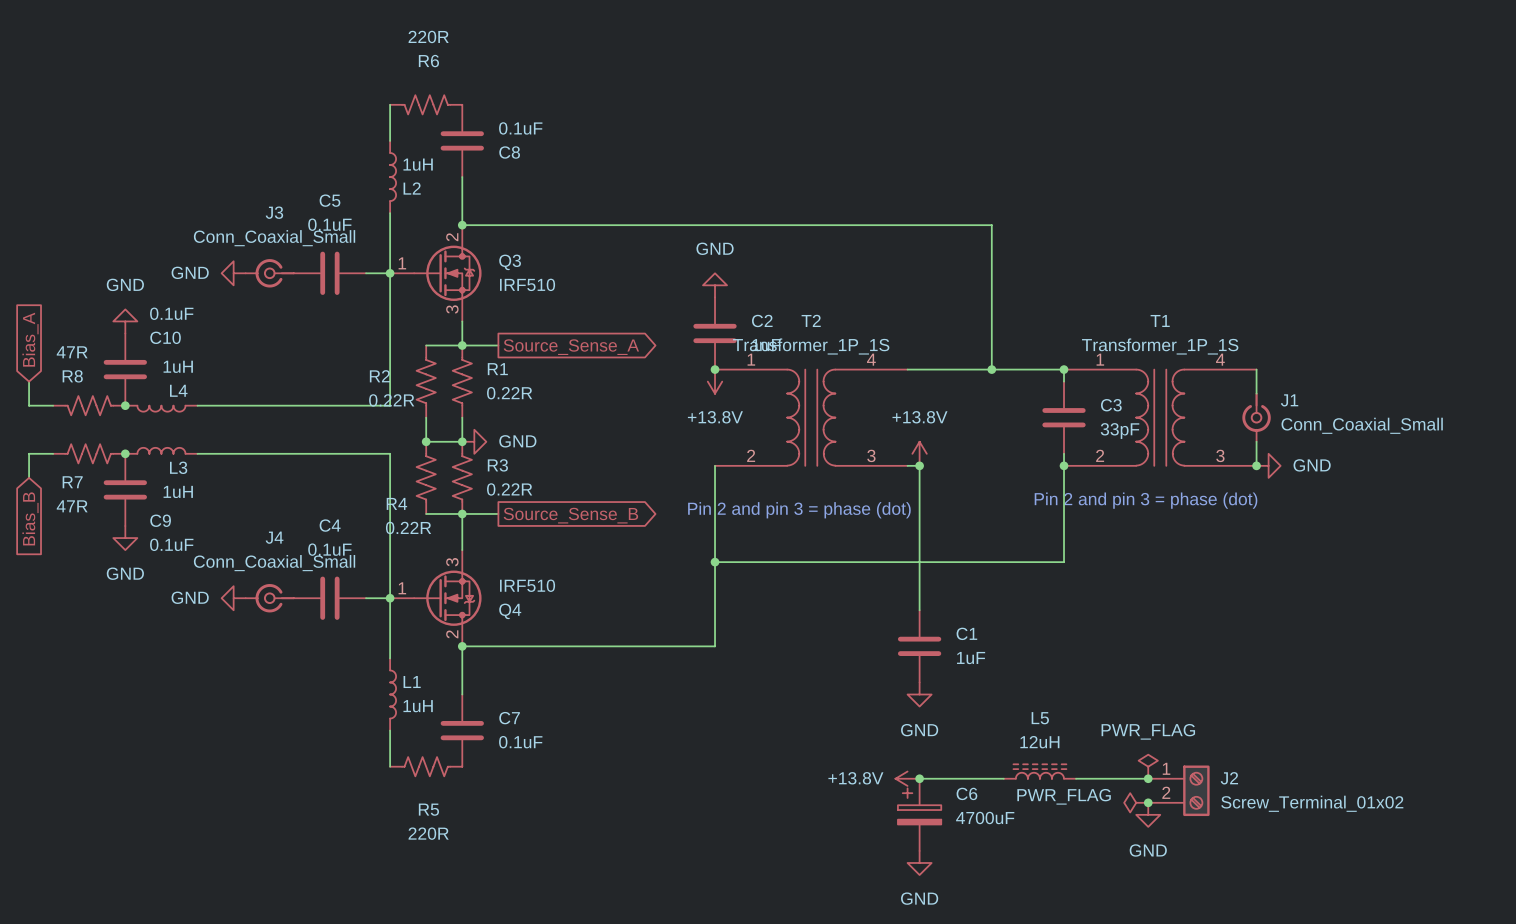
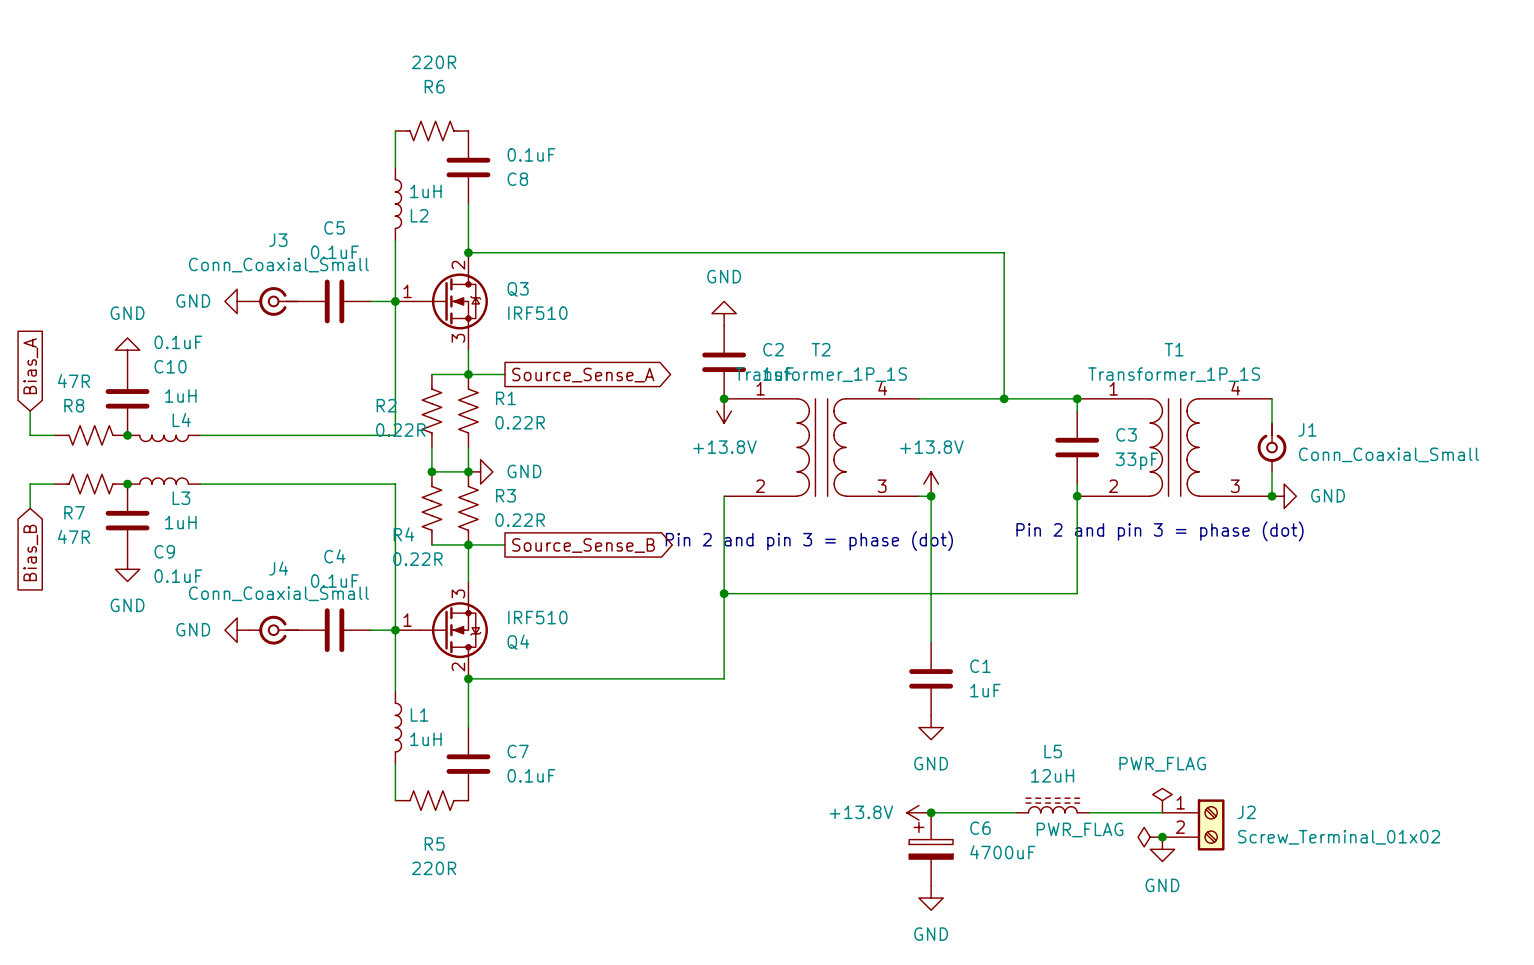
junction: (1148, 778) -> none

